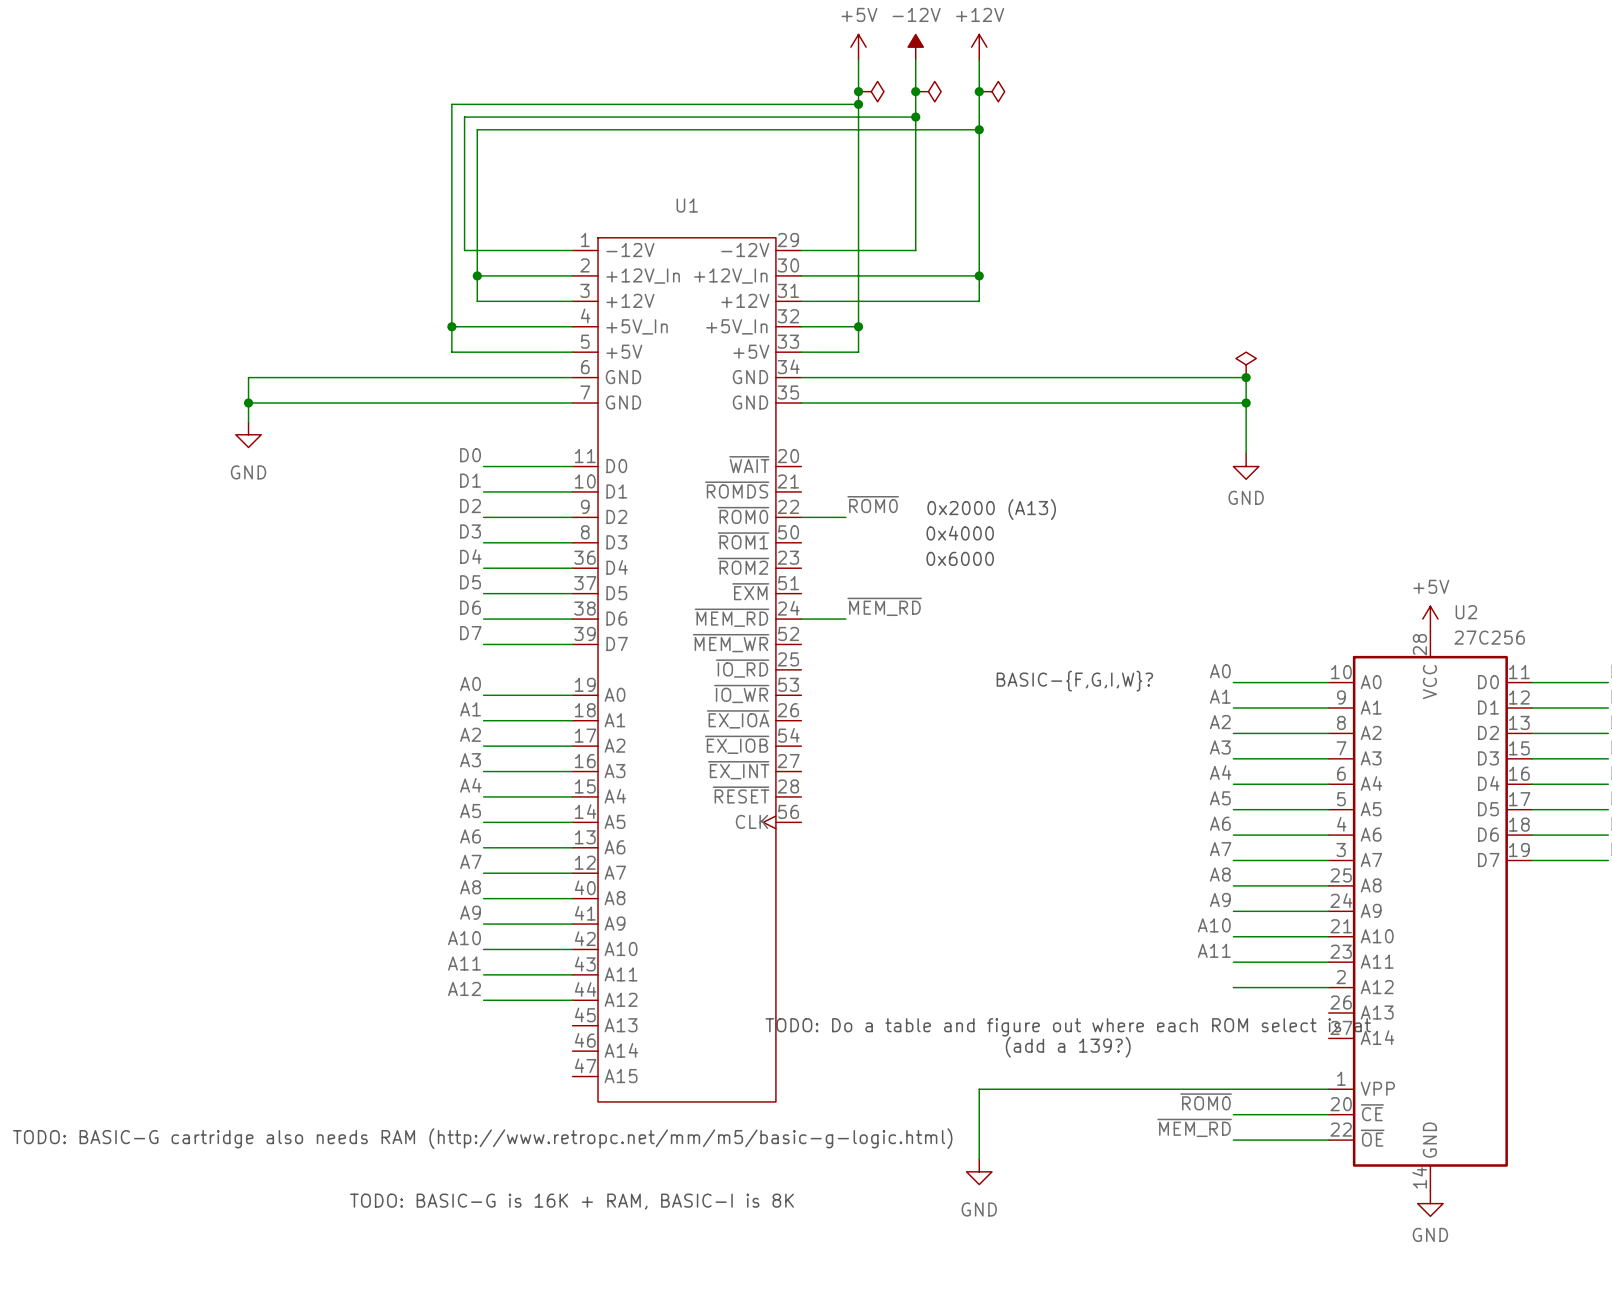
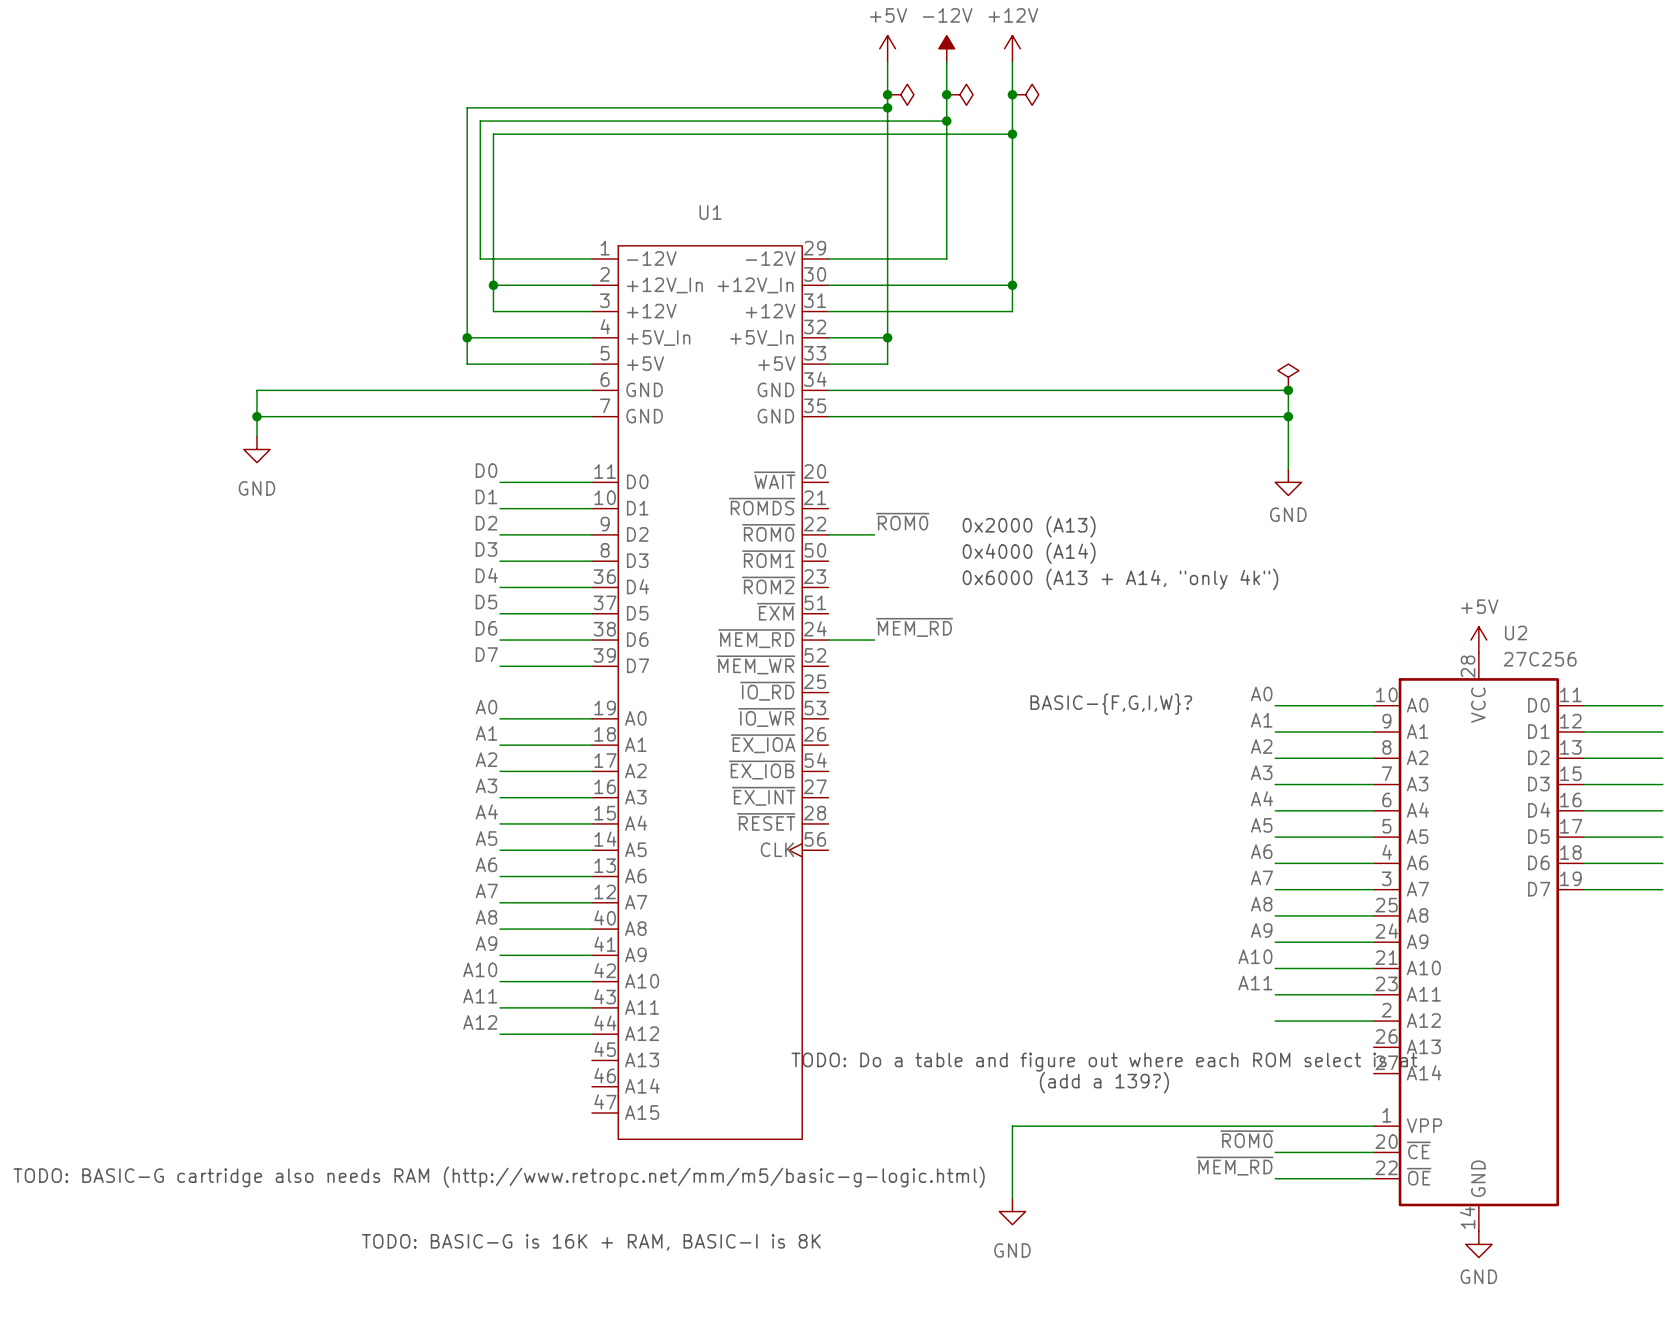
text position: 0x2000 (A13) (991, 509) -> 0x2000 (A13) (1029, 526)
text: 0x4000 (960, 533) -> 0x4000 (A14) (1029, 553)
text: 0x6000 (960, 558) -> none
text: none -> 0x6000 (A13 + A14, "only 4k") (1120, 579)

